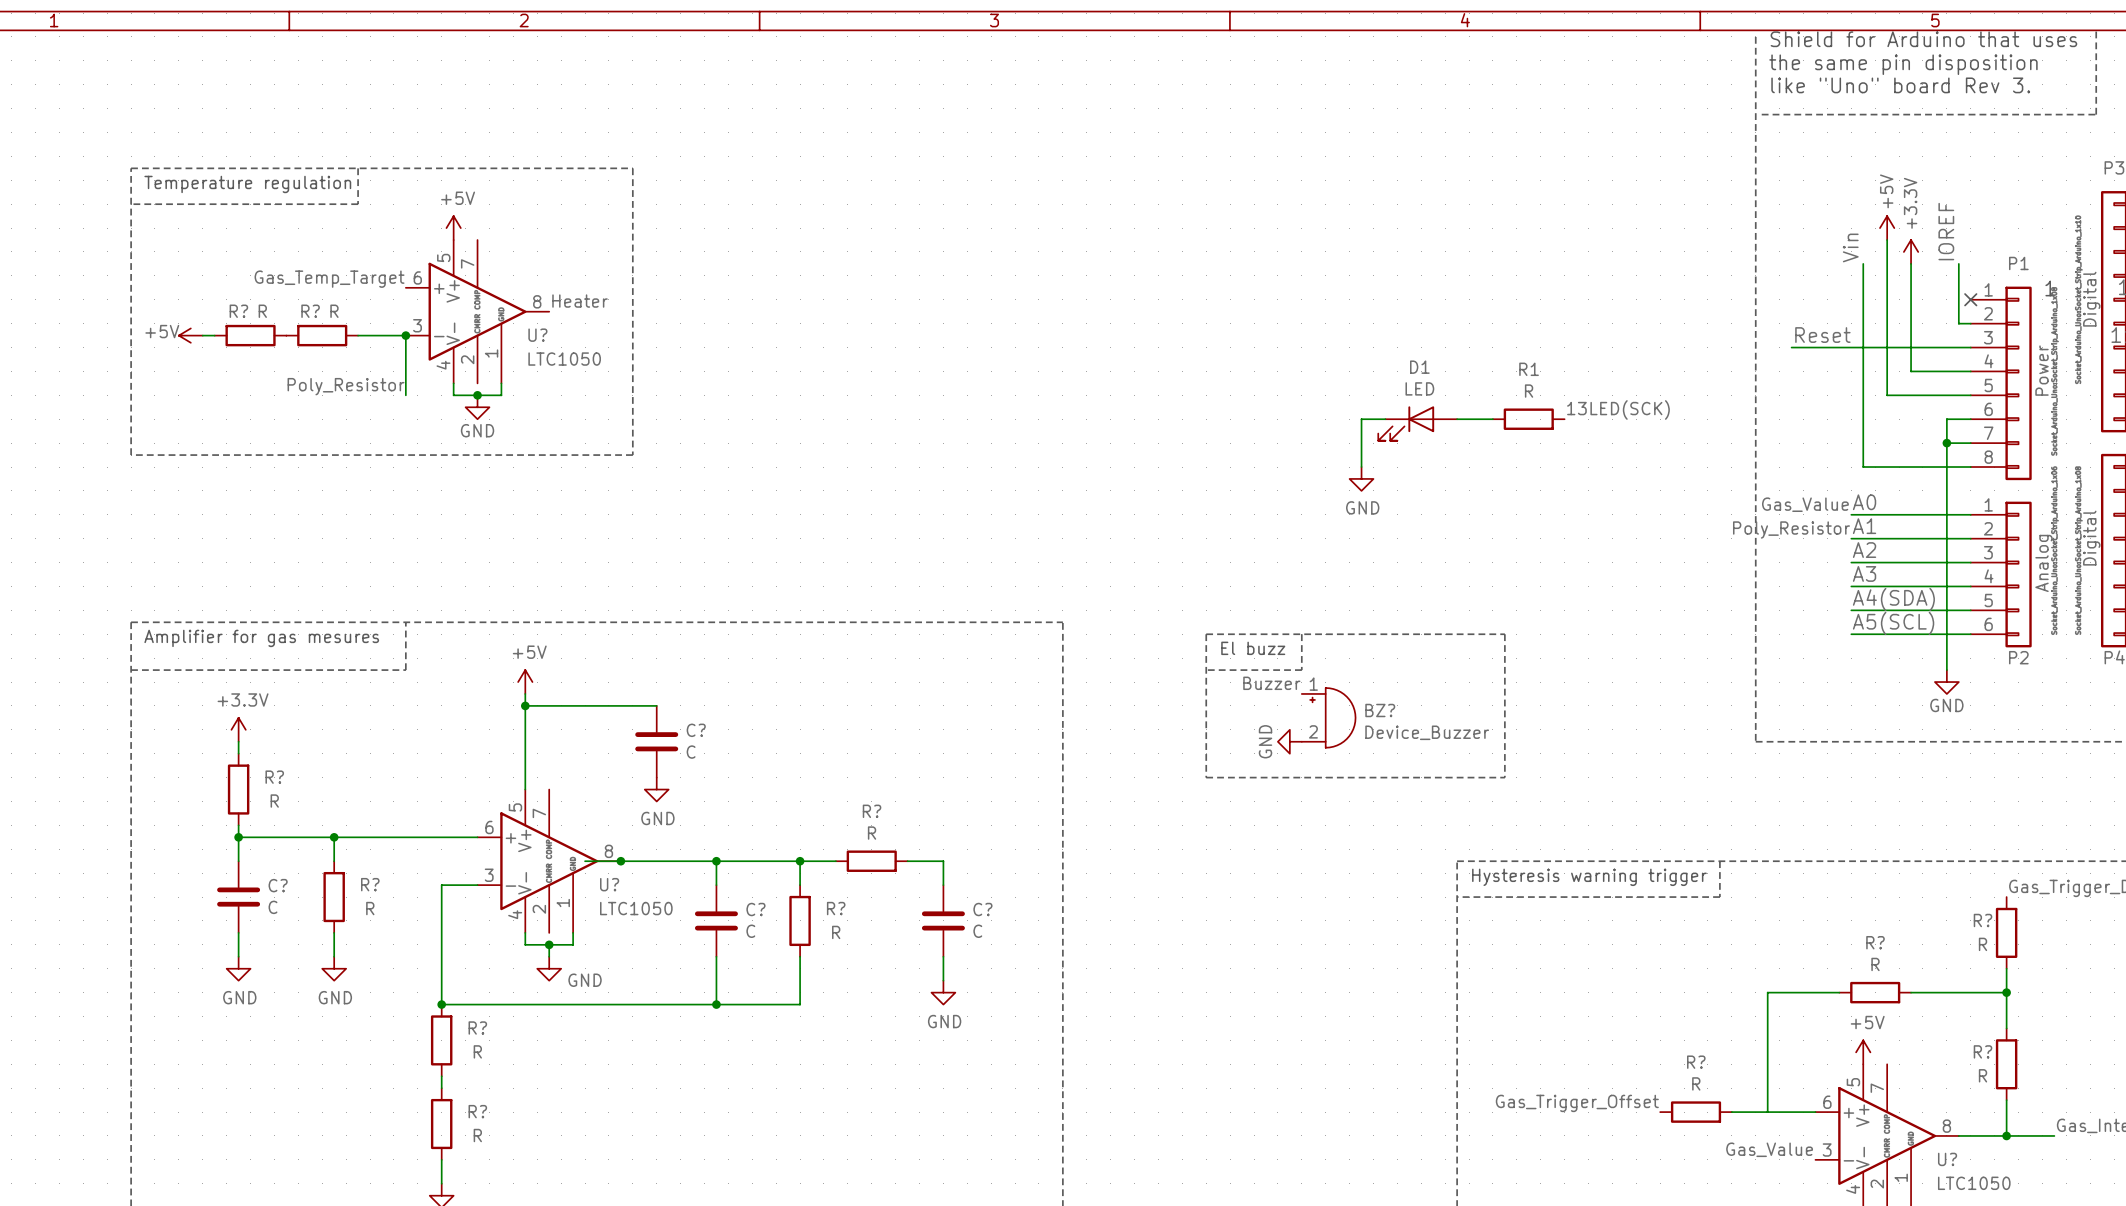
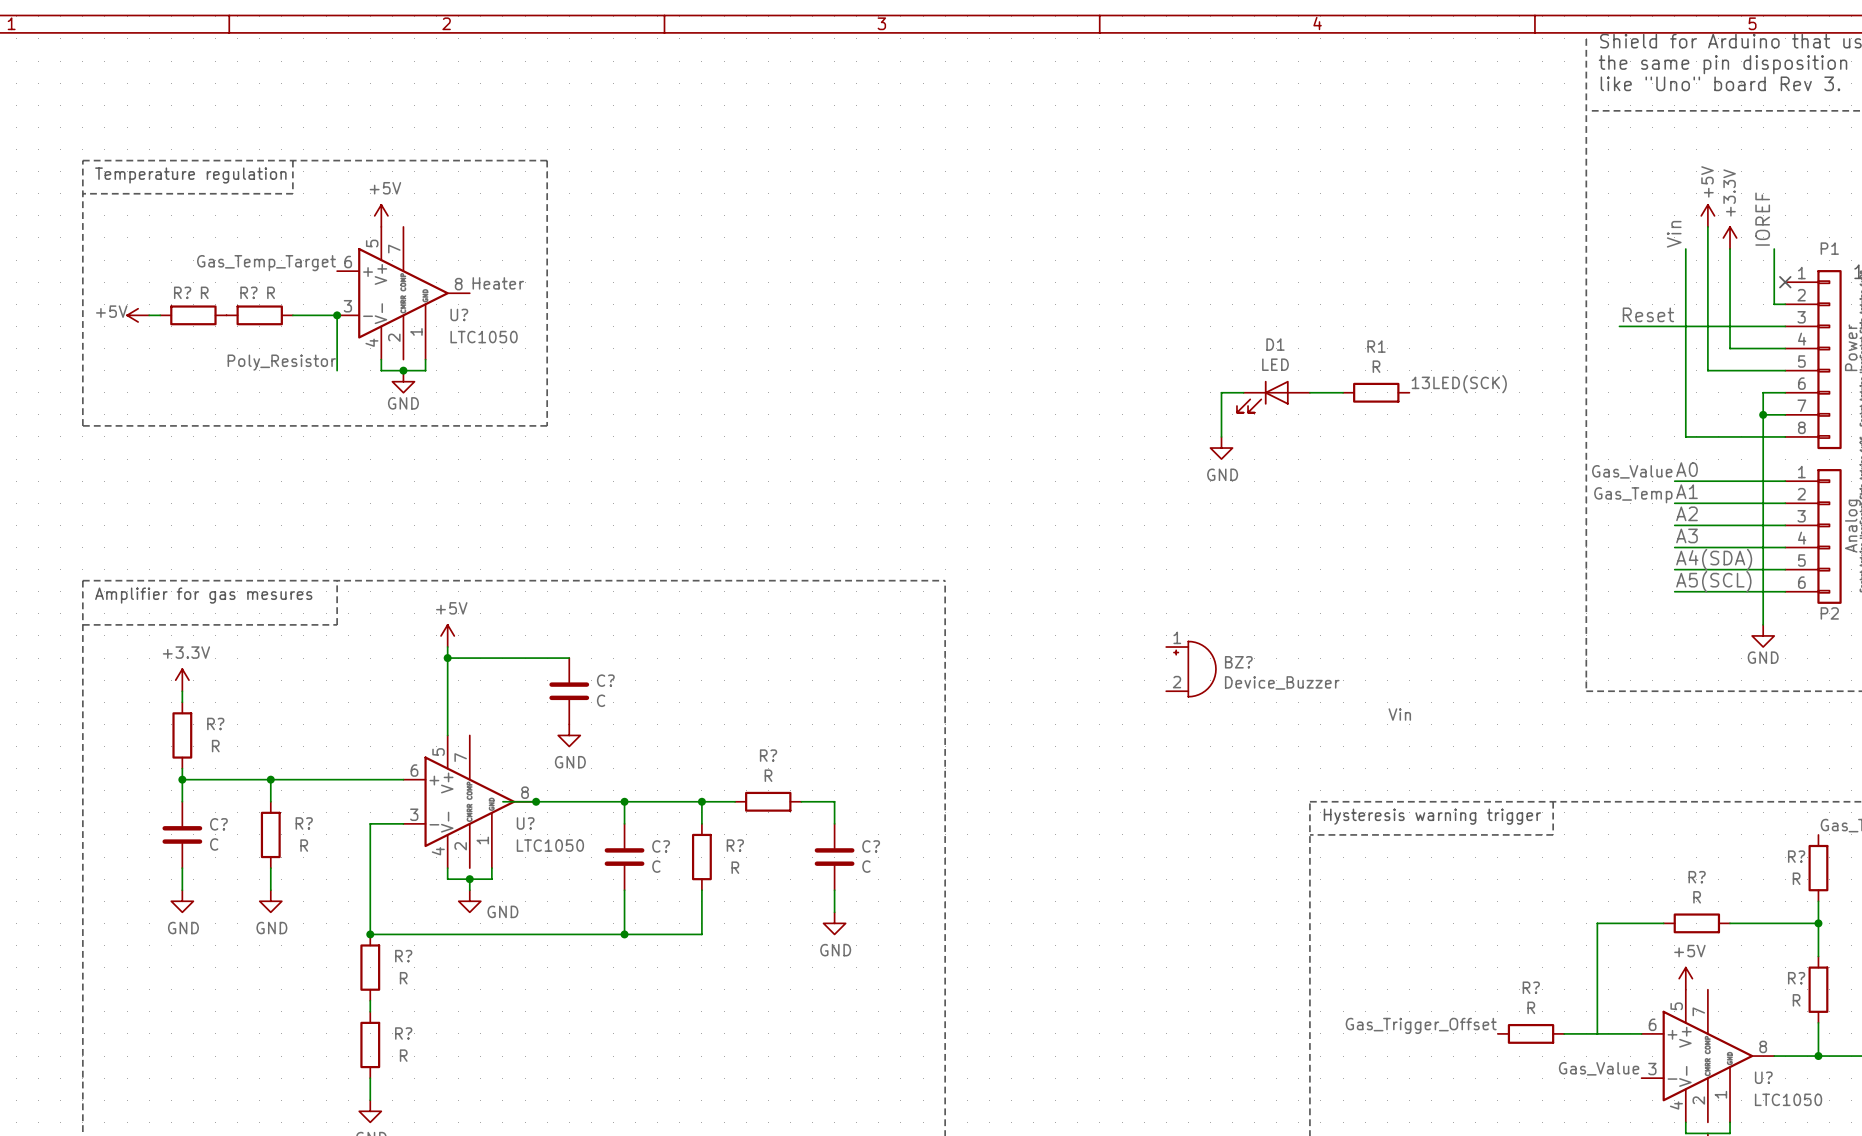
label: Poly_Resistor (1791, 530) -> Gas_Temp (1633, 495)
line: (1206, 634) (1504, 634) (1504, 777) (1206, 777) (1206, 634) -> none
line: (1301, 634) (1301, 670) (1206, 670) -> none
text: El buzz (1253, 648) -> none
label: Buzzer (1271, 683) -> none
power symbol: GND (1289, 741) -> none
label: none -> Vin (1399, 714)

